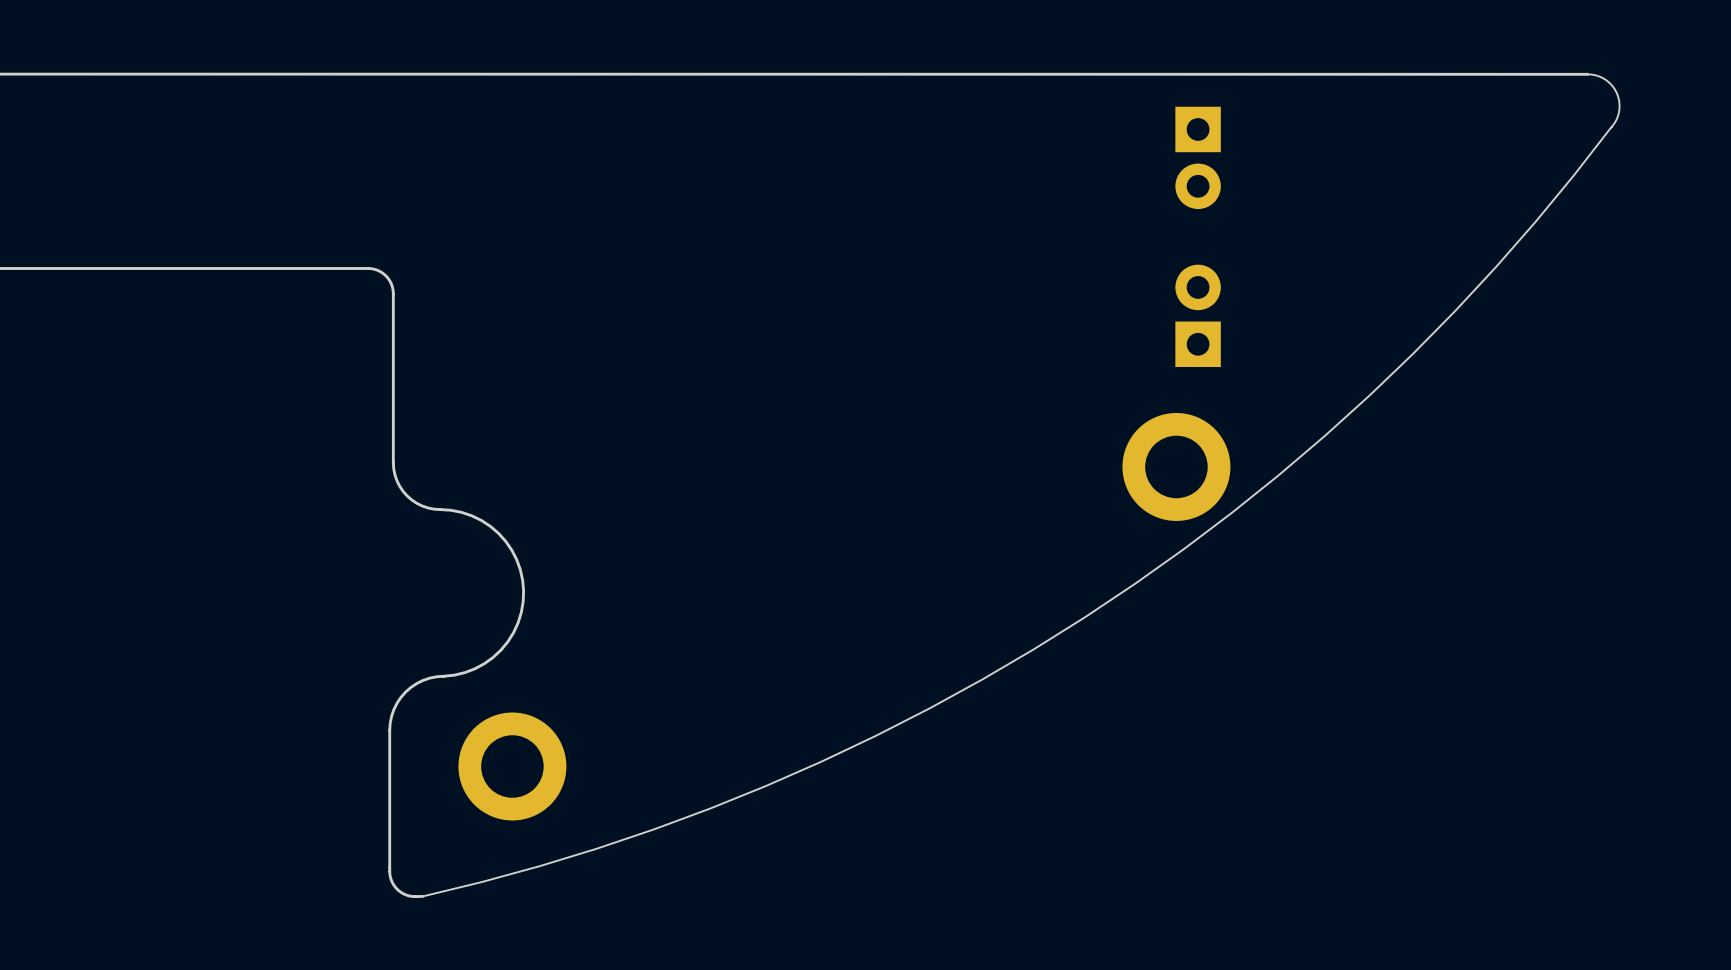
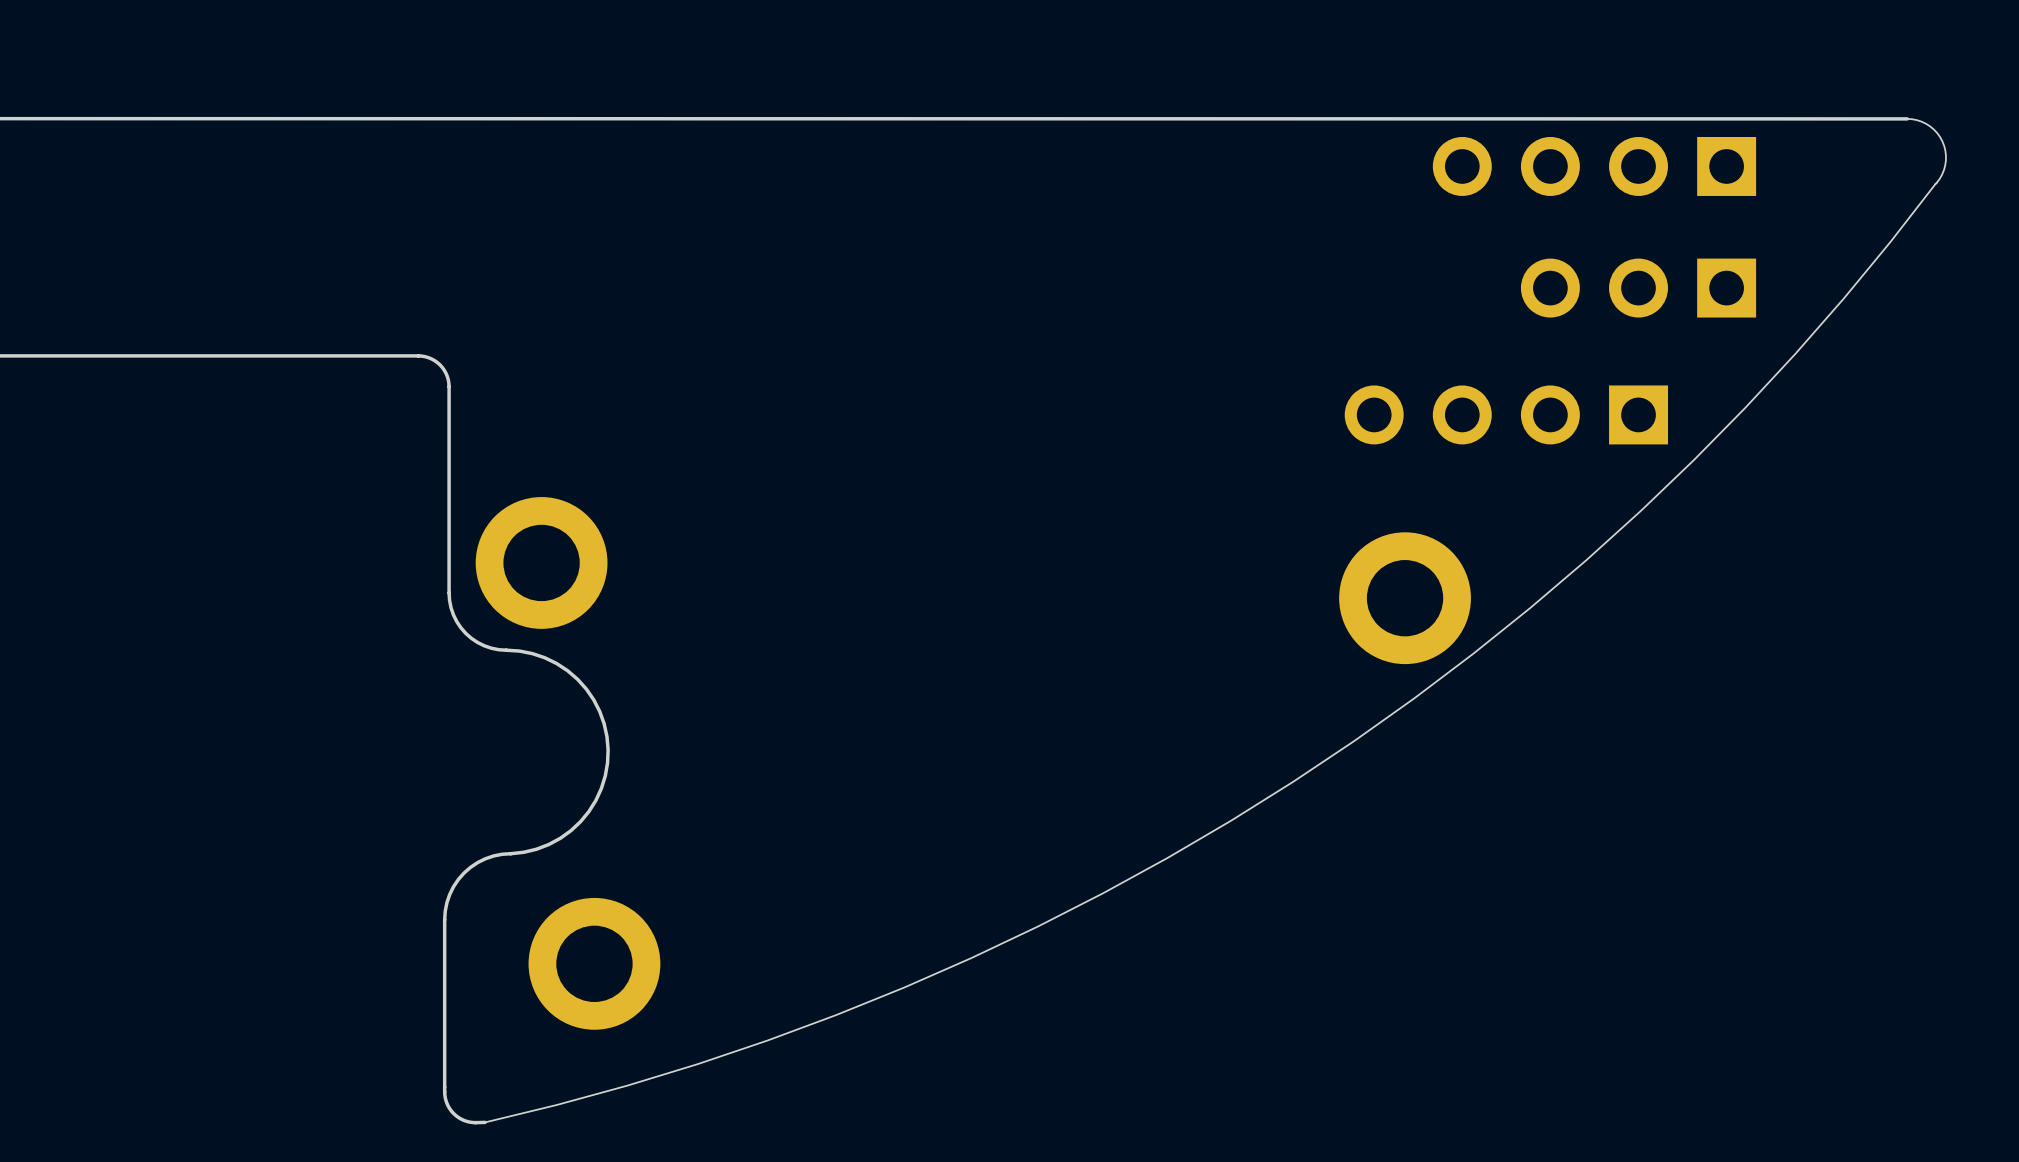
part: none -> (1594, 166)
part: (1198, 157) -> none
part: none -> (1638, 288)
part: (1198, 315) -> none
part: none -> (1506, 414)
part: none -> (541, 562)

